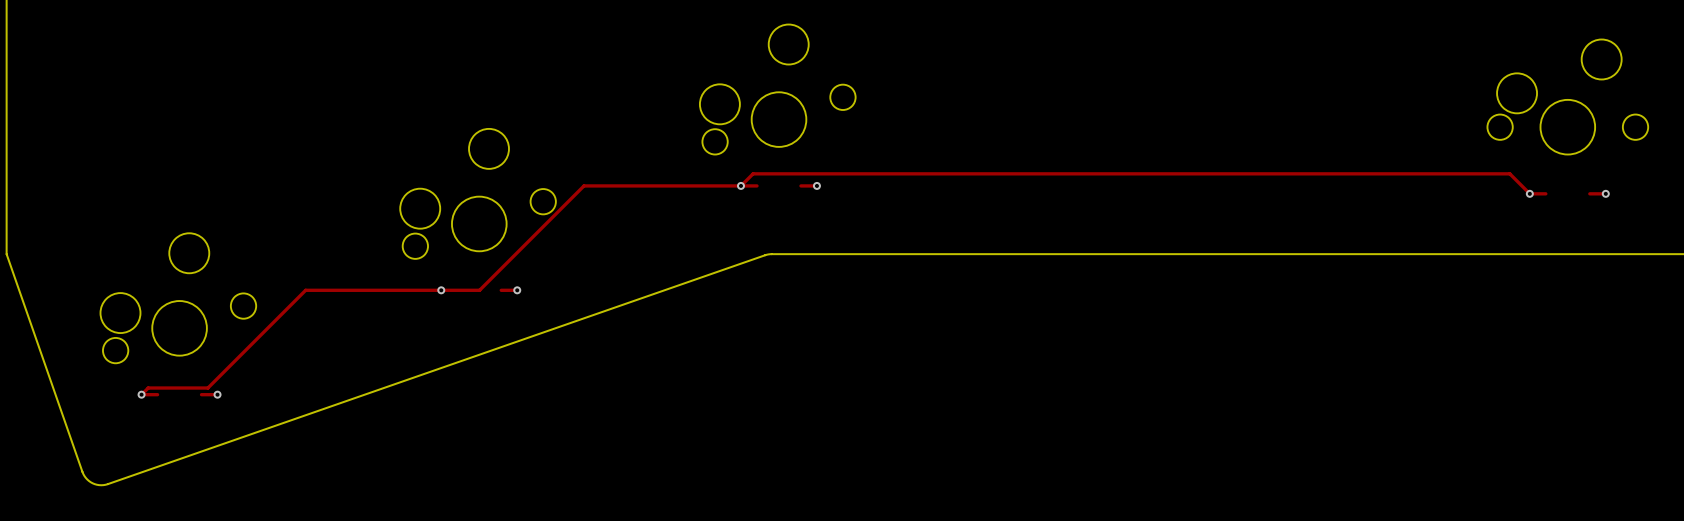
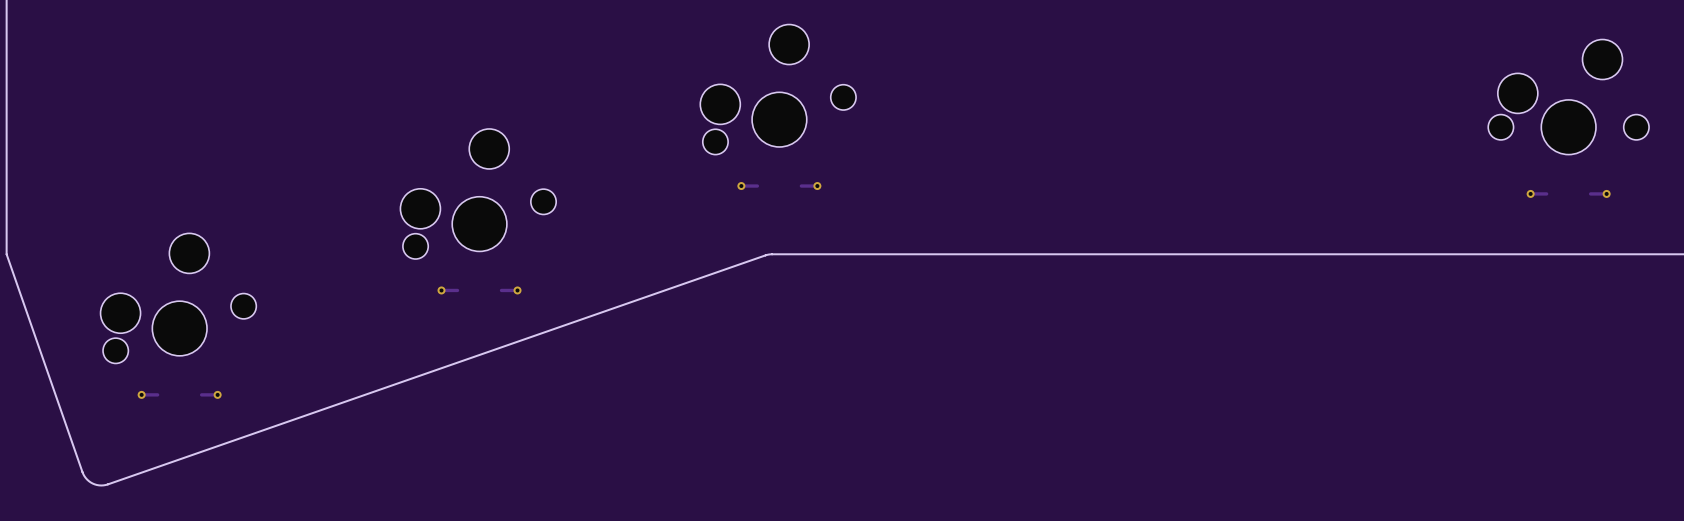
track: (1529, 193) (1509, 173) (753, 173) (740, 185) (583, 185) (479, 290) (457, 290) -> none
track: (441, 290) (305, 290) (207, 388) (148, 388) (141, 394) -> none

